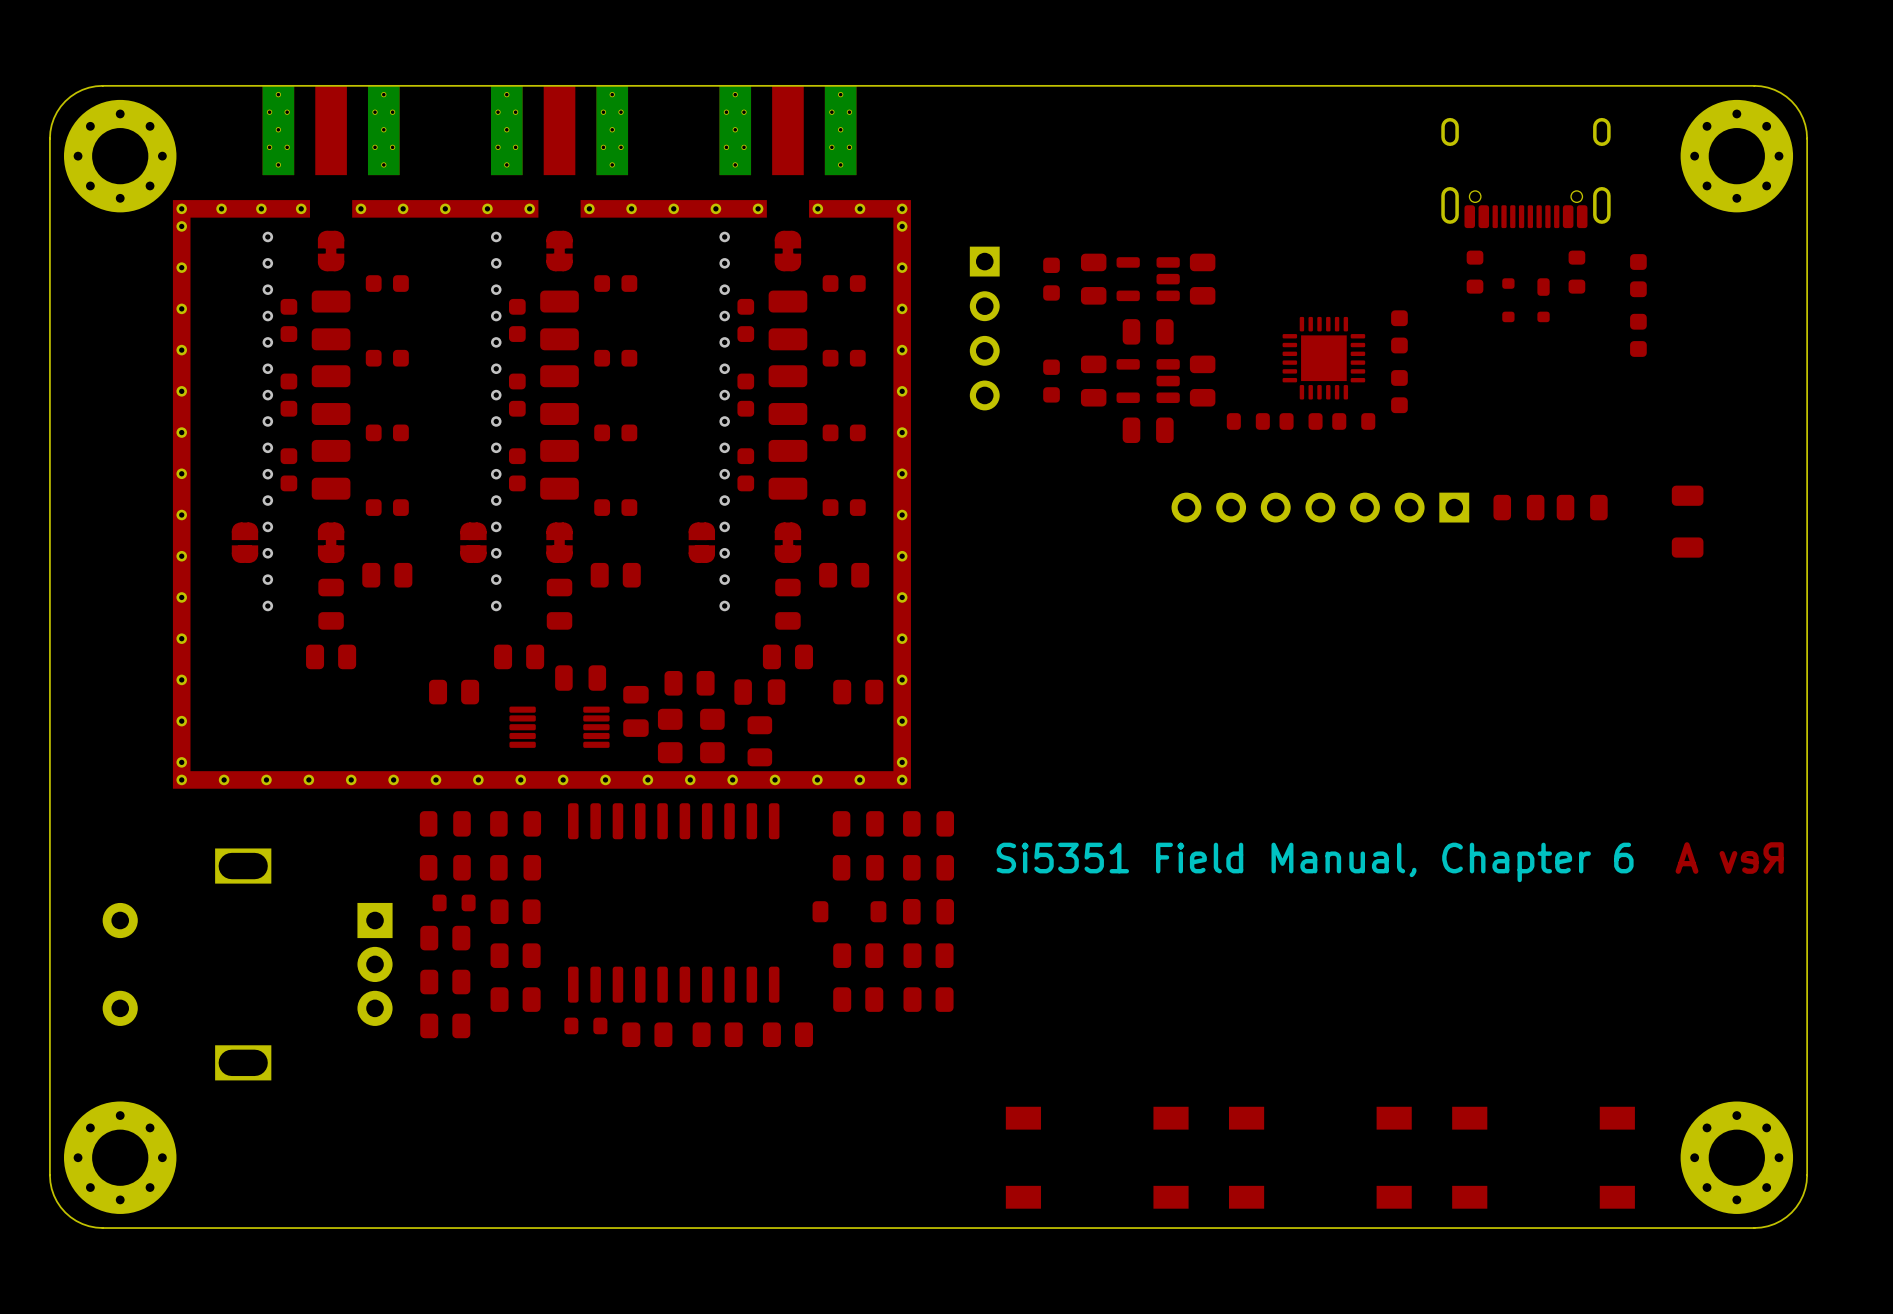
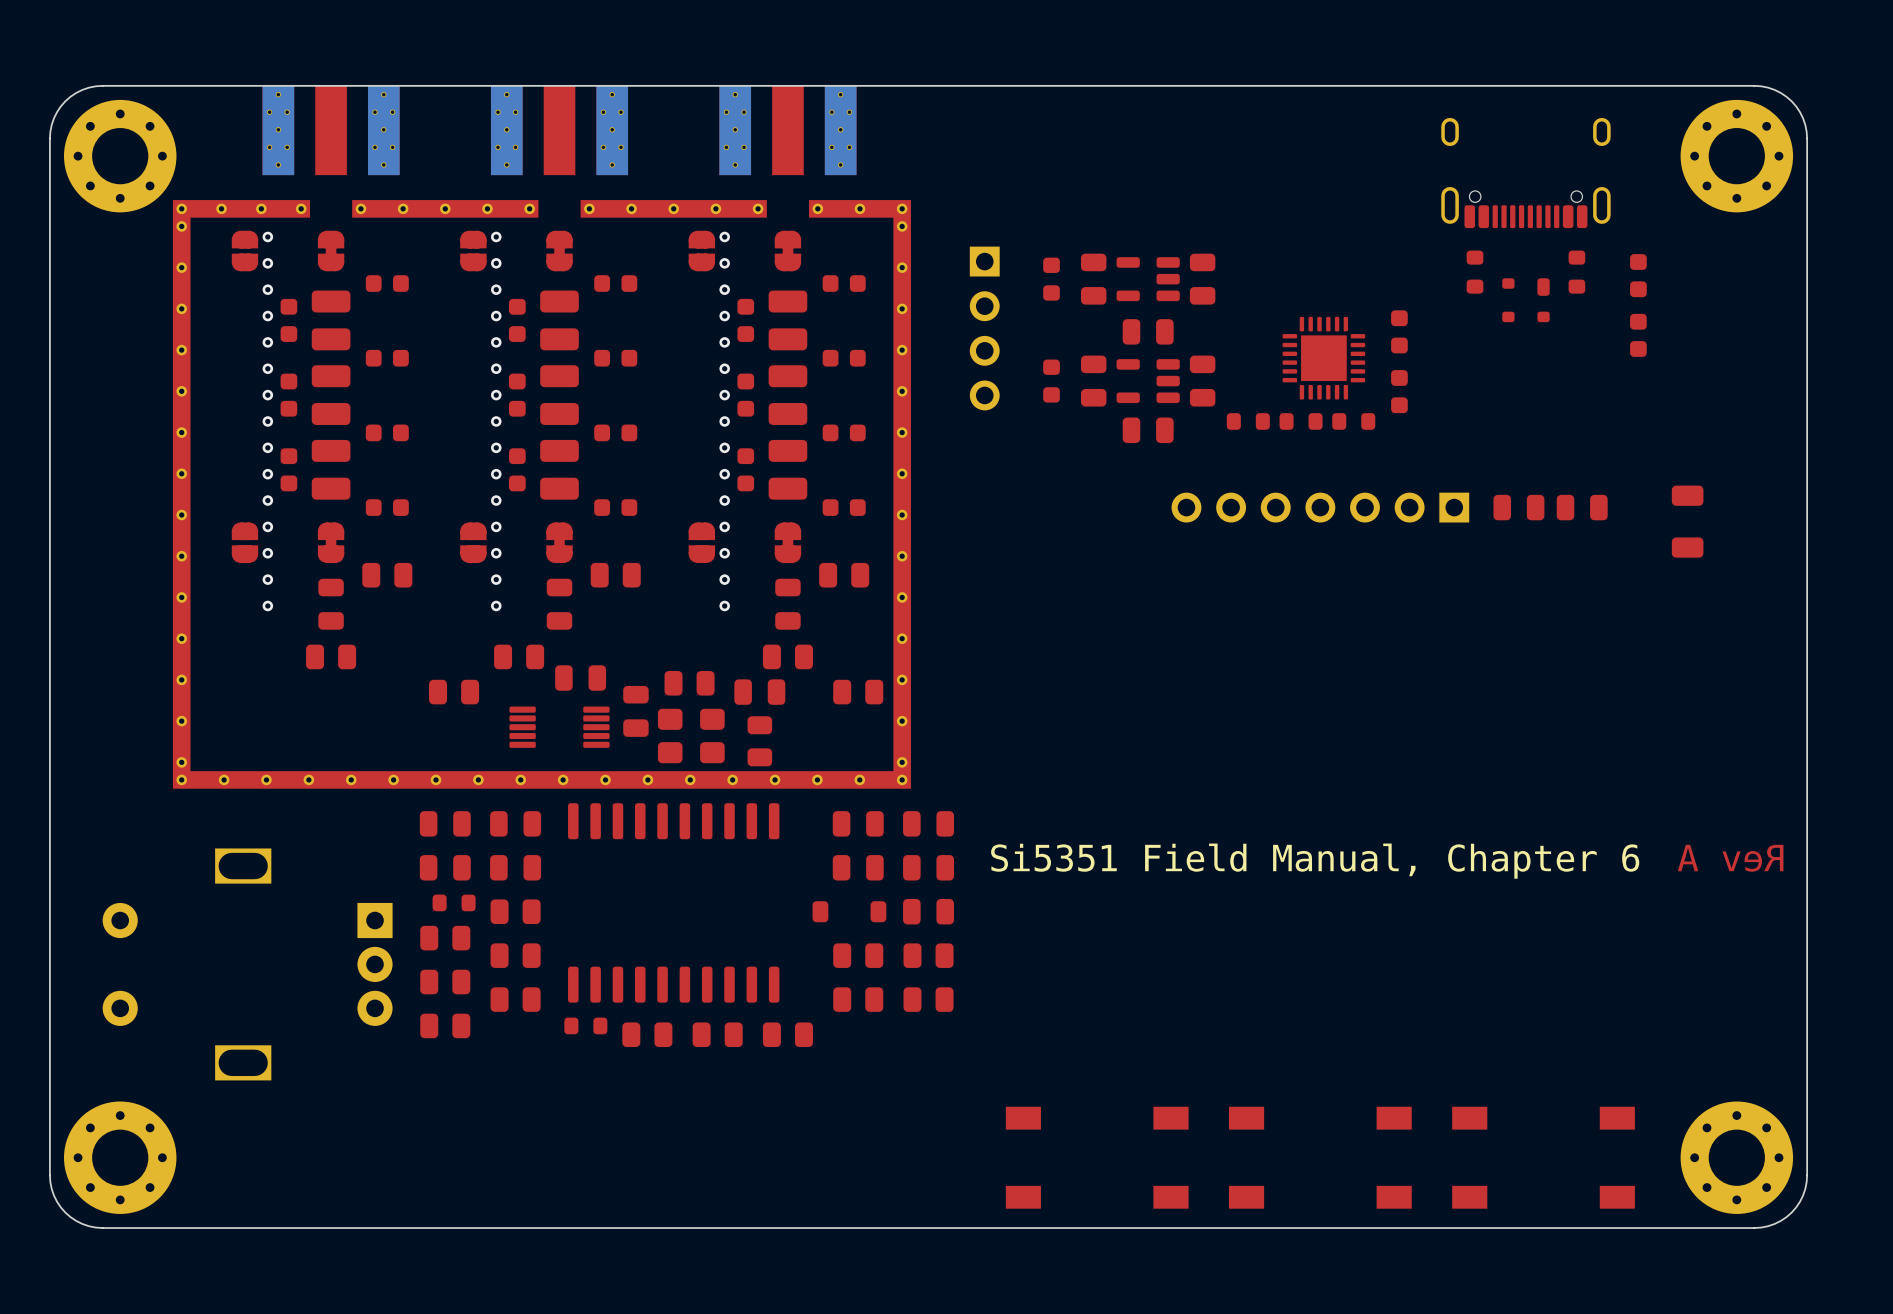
part: none -> (244, 251)
part: none -> (473, 251)
part: none -> (701, 251)

